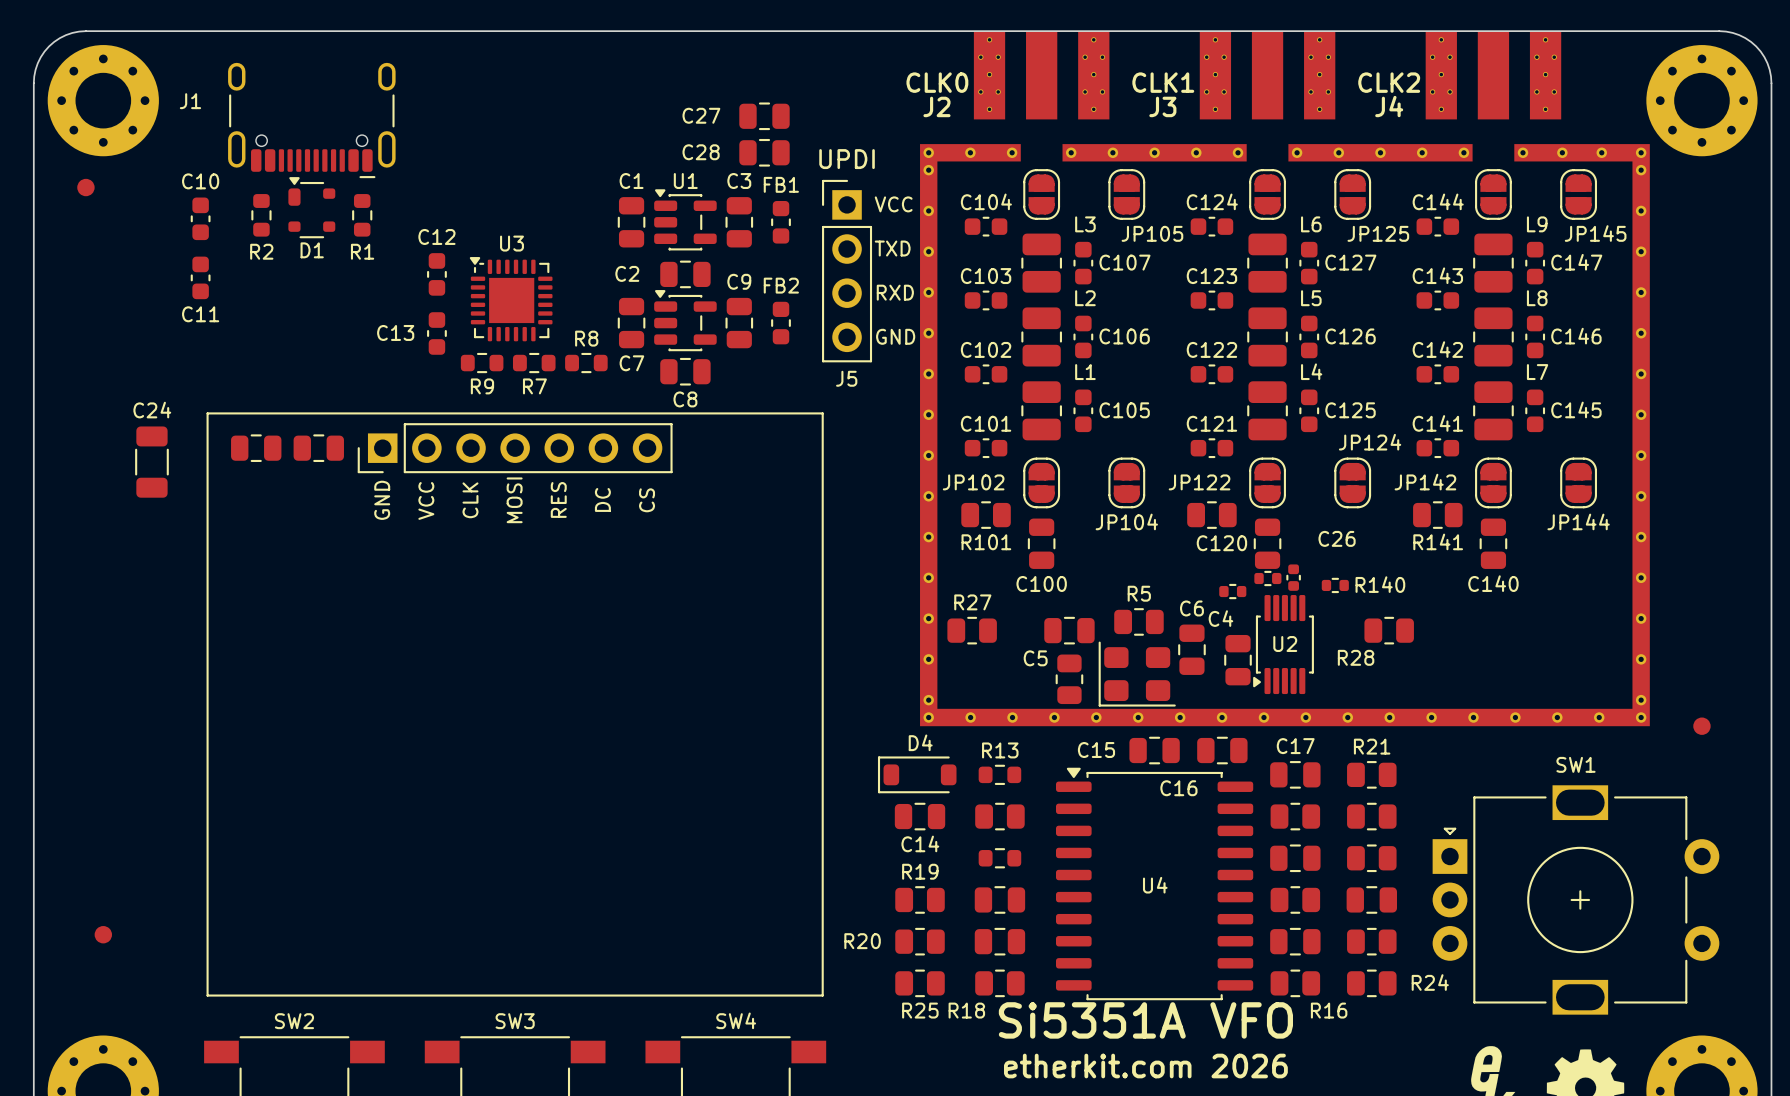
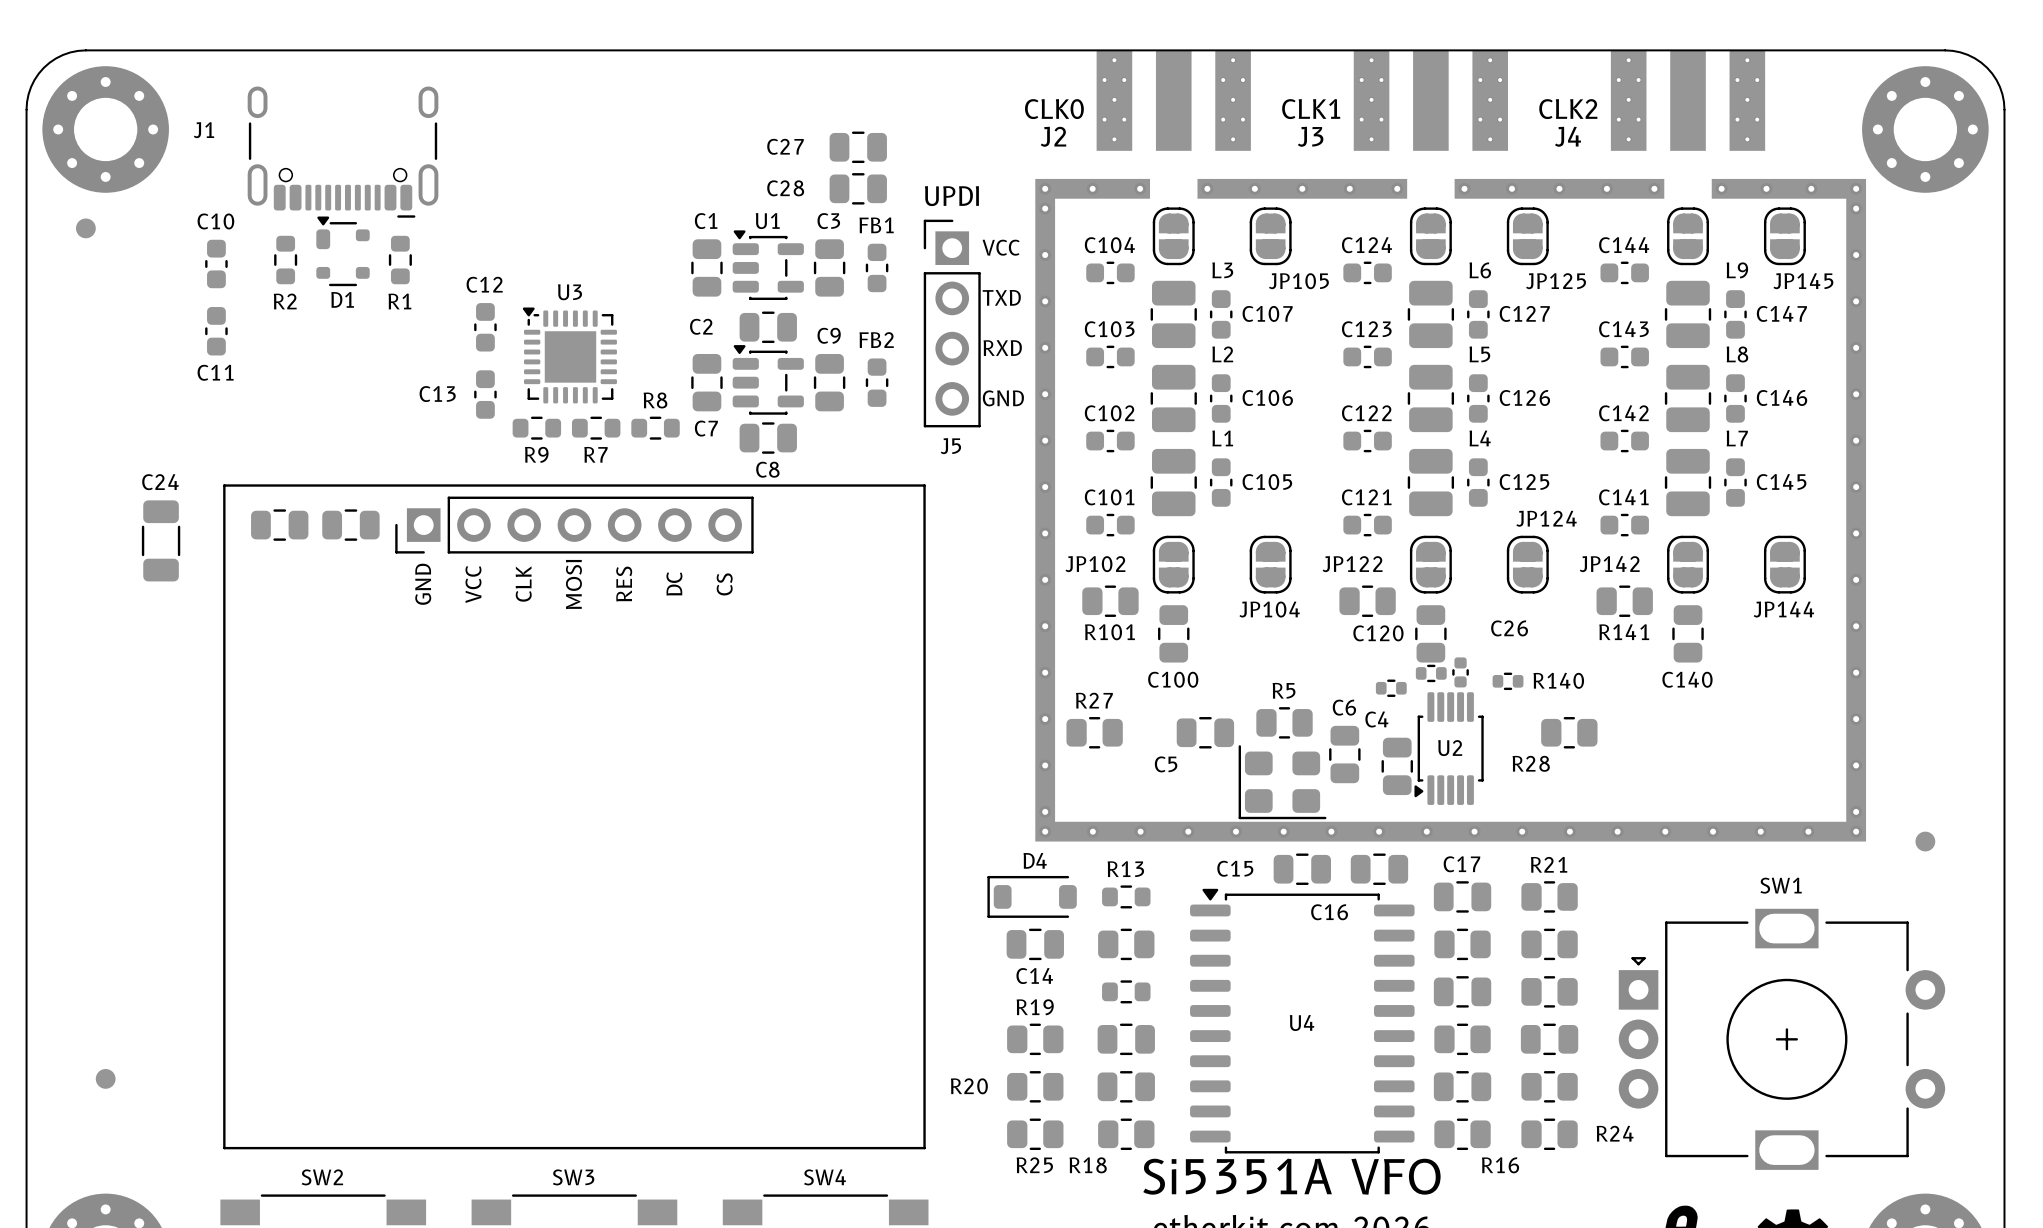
part: (1069, 679) -> none

